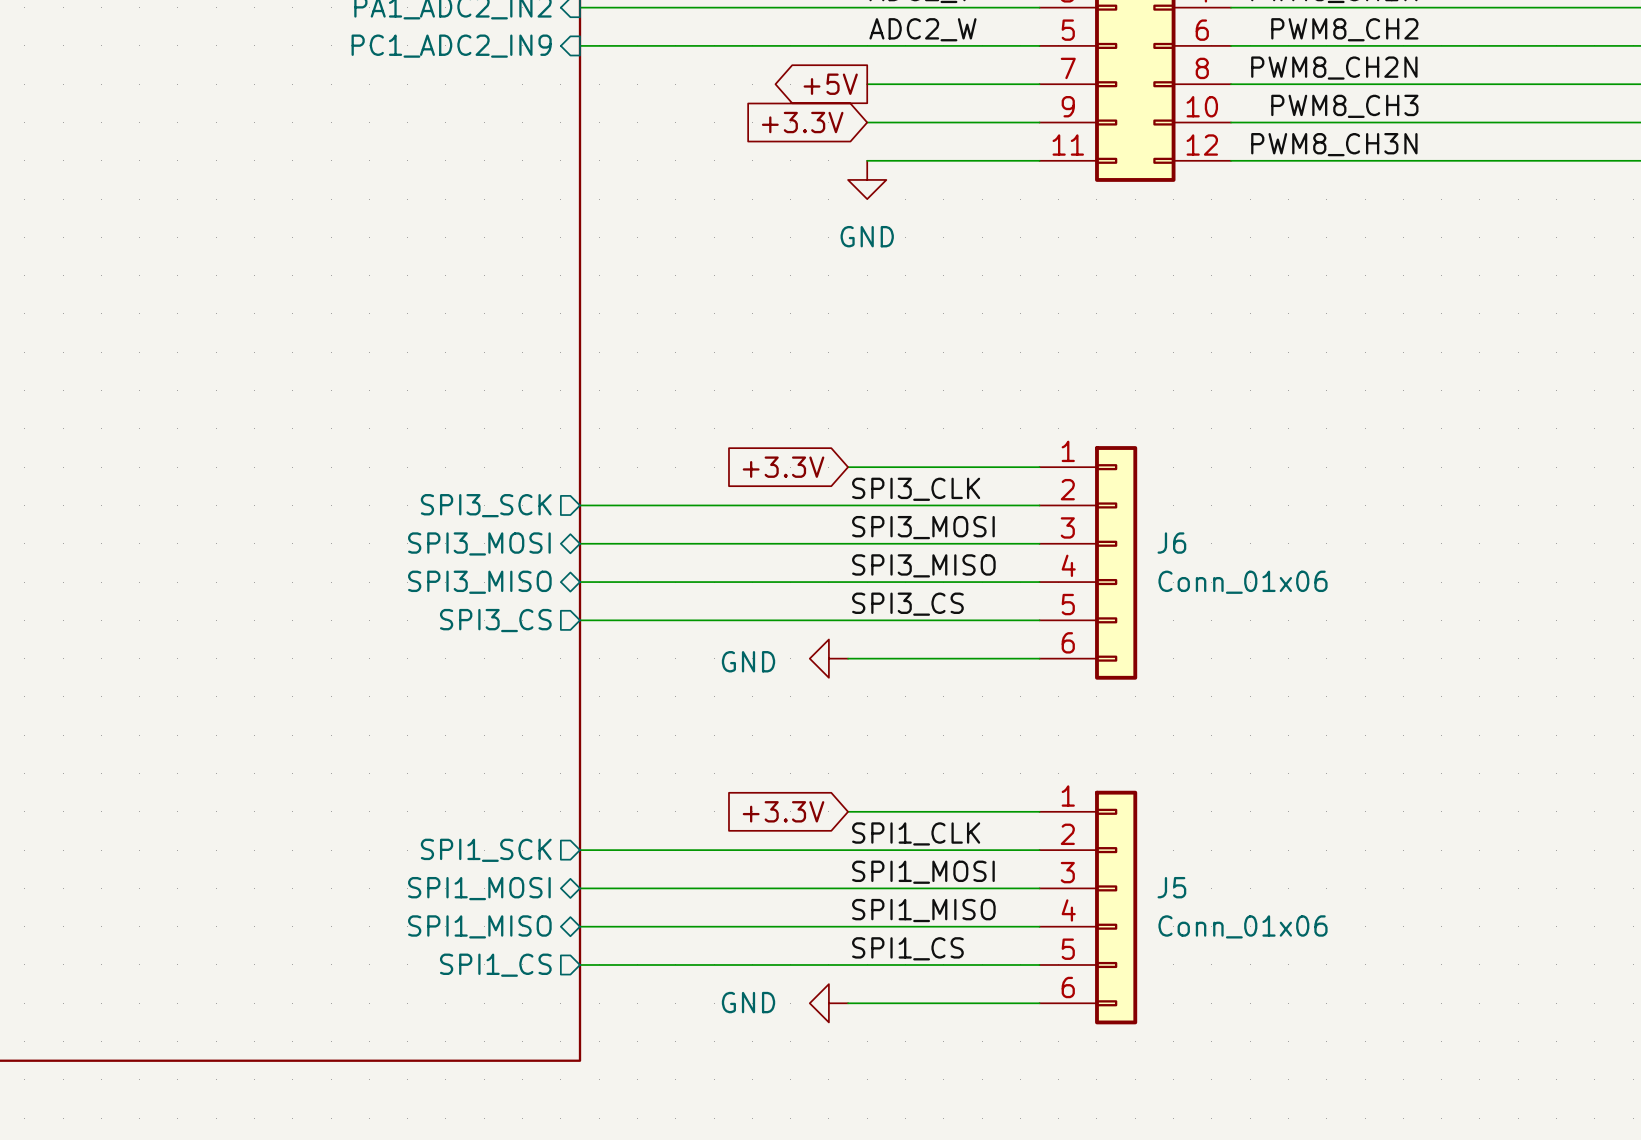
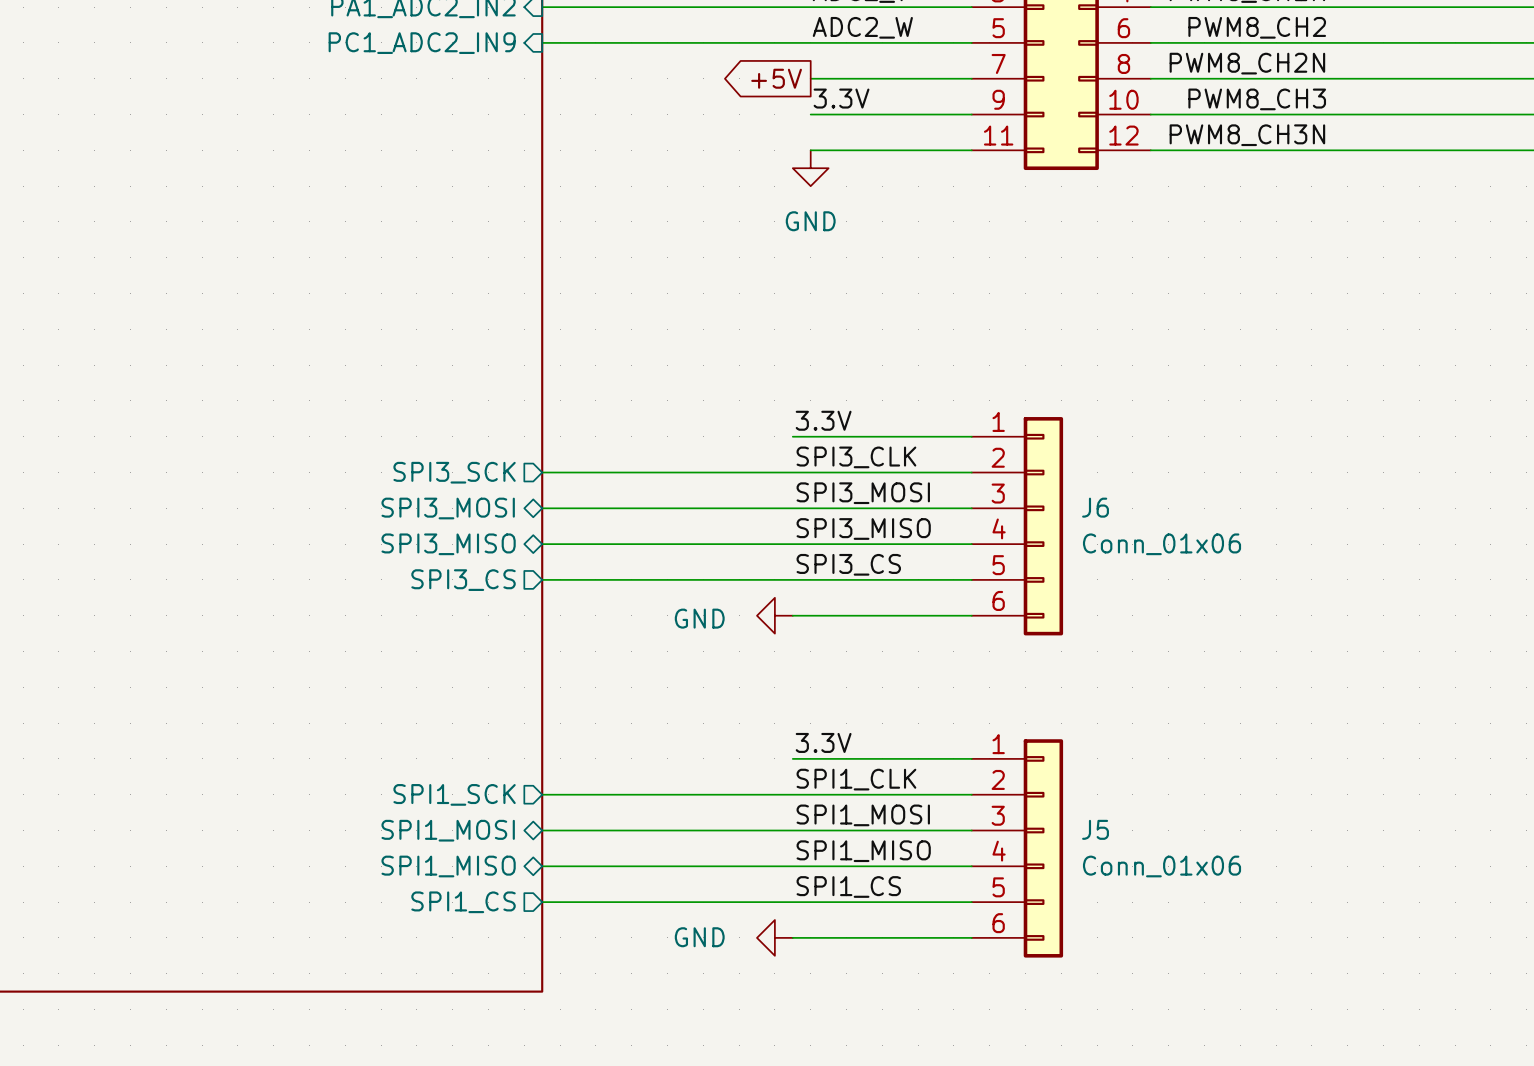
label: none -> 3.3V (841, 98)
global label: +3.3V (802, 122) -> none
label: none -> 3.3V (823, 420)
global label: +3.3V (783, 467) -> none
label: none -> 3.3V (823, 742)
global label: +3.3V (783, 811) -> none

